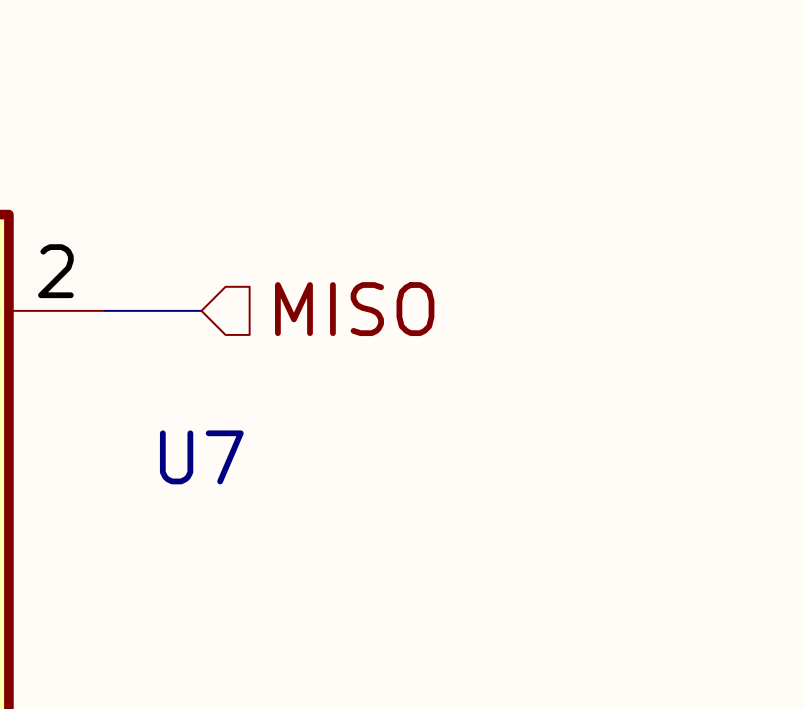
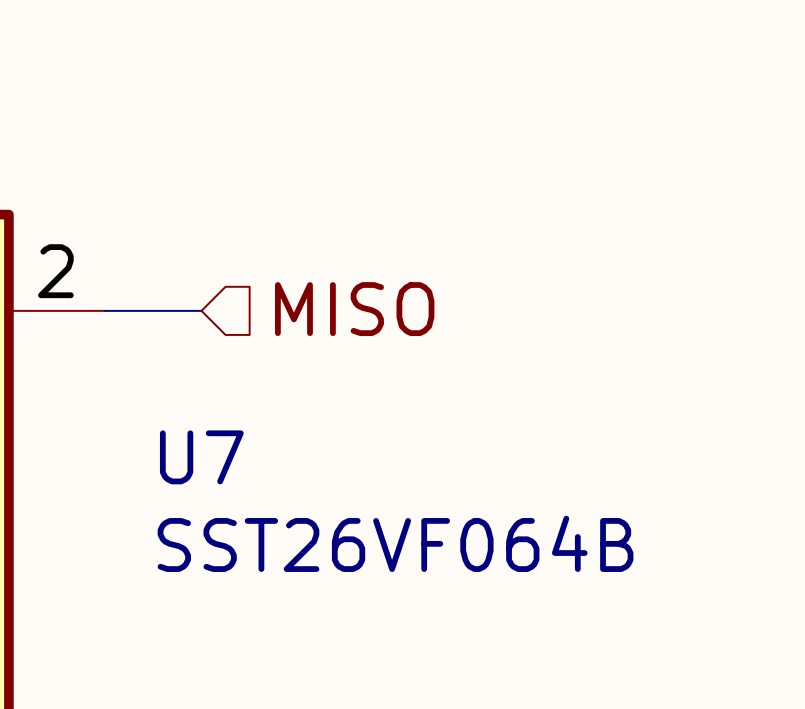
U7 value: none -> SST26VF064B (395, 543)

